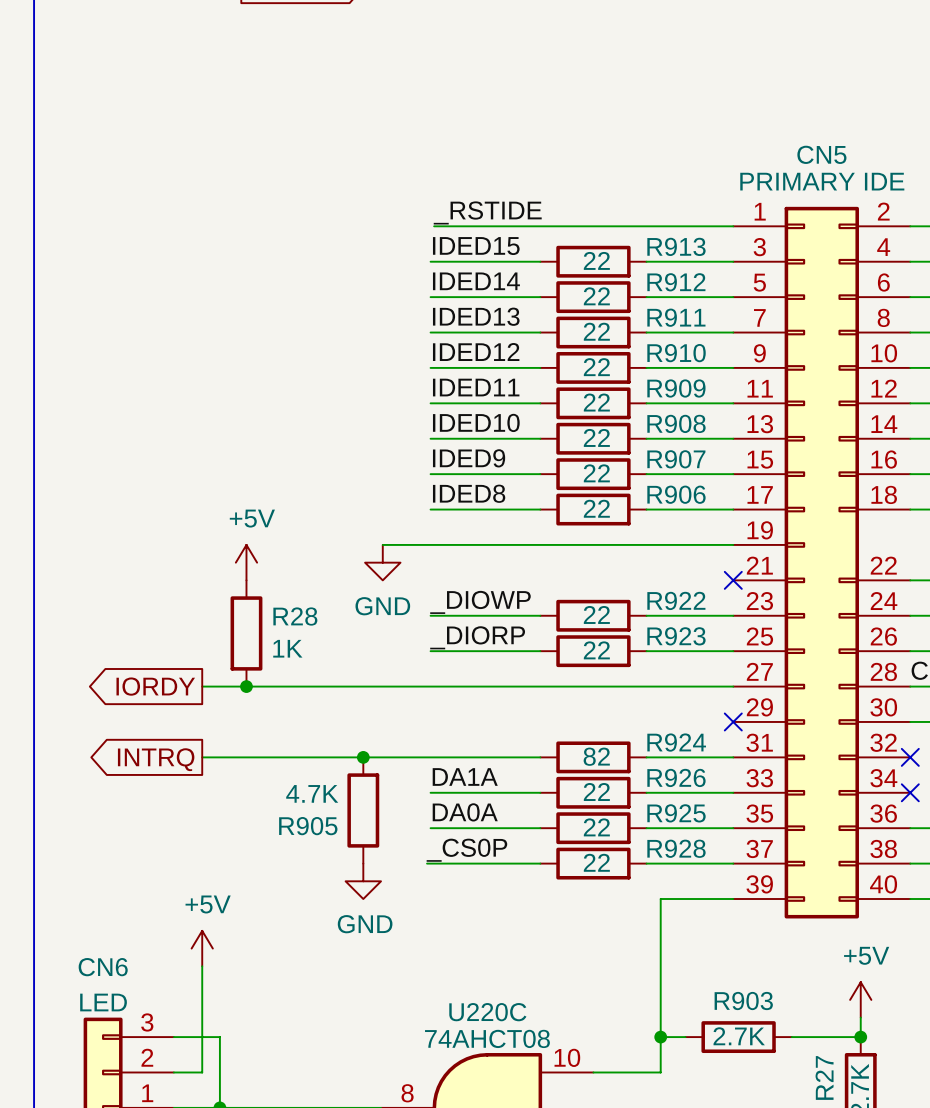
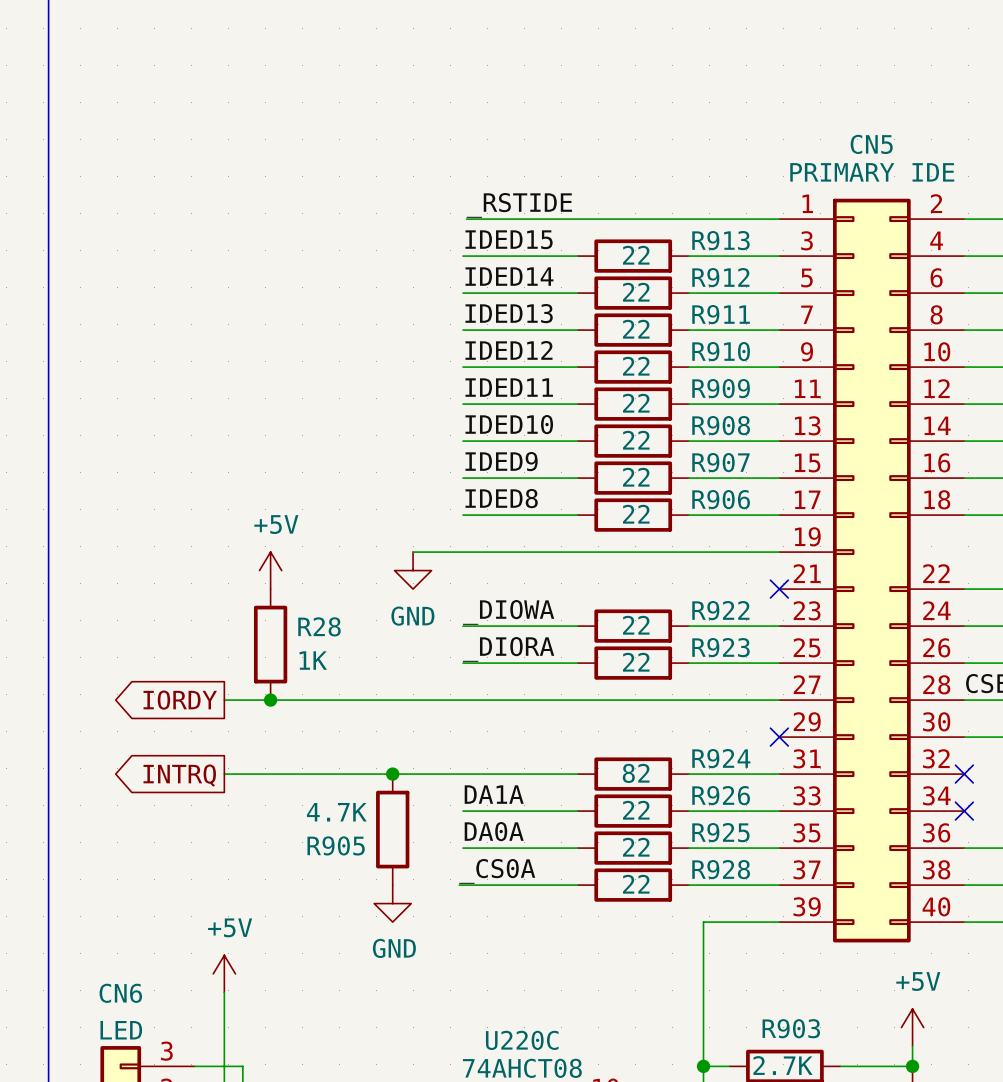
label: _DIOWP (480, 602) -> _DIOWA (508, 612)
label: _DIORP (477, 637) -> _DIORA (508, 649)
label: _CS0P (466, 850) -> _CS0A (497, 871)

